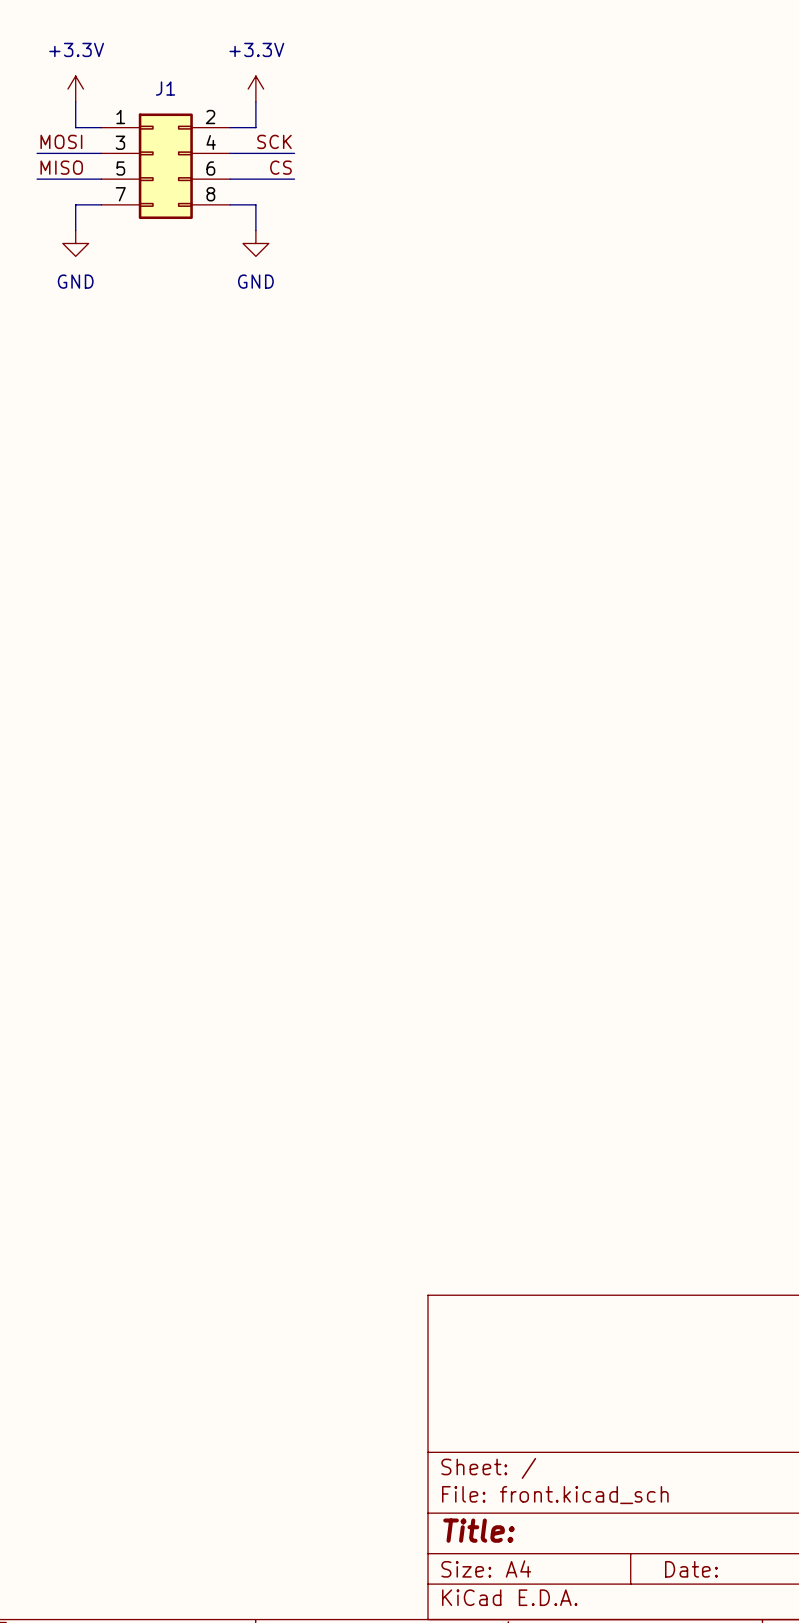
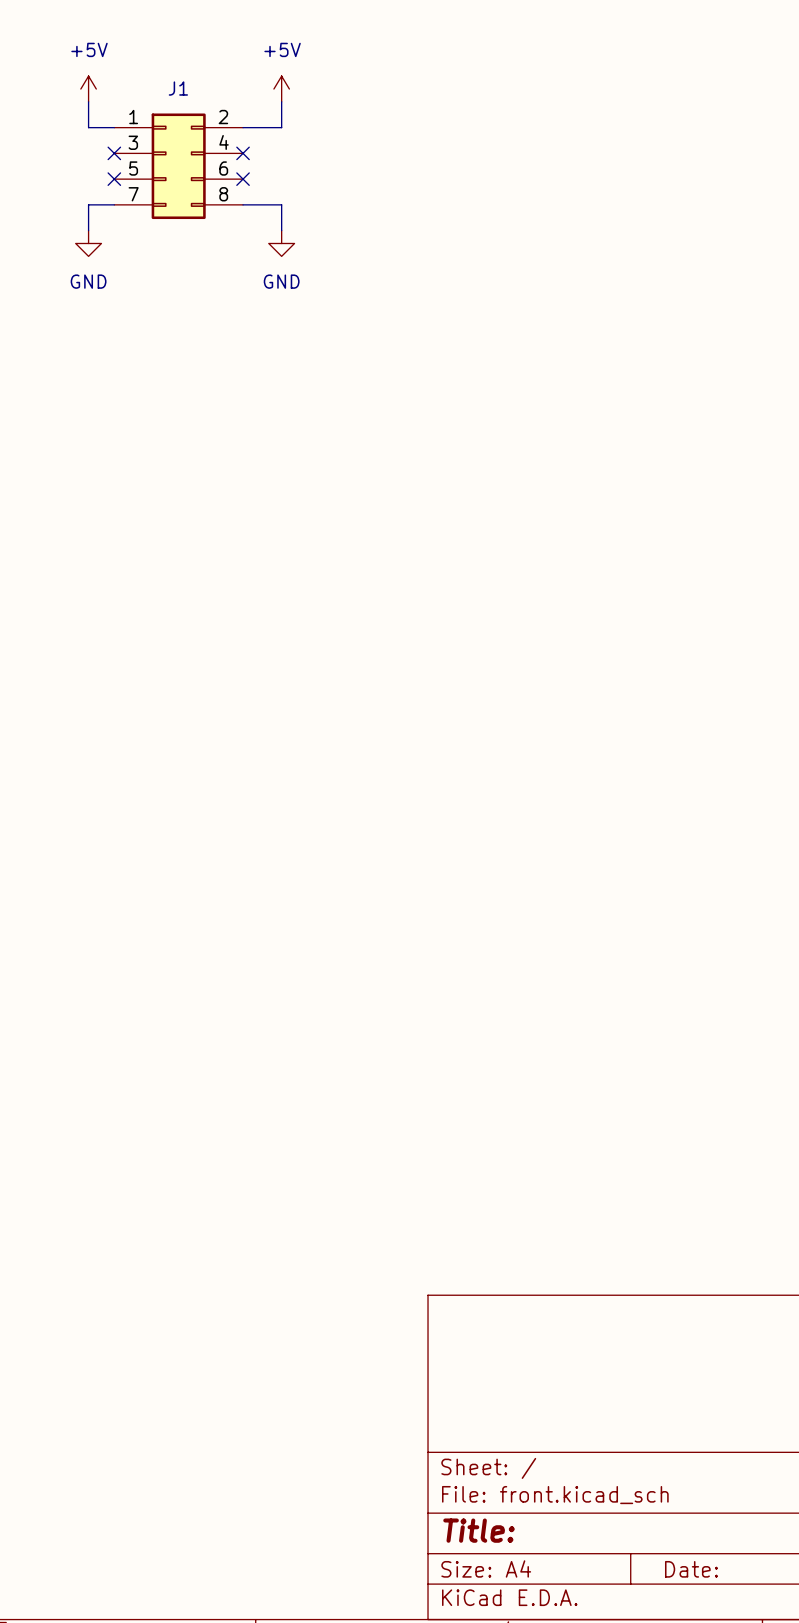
power symbol: +3.3V (75, 89) -> none
power symbol: none -> +5V (88, 89)
power symbol: +3.3V (255, 89) -> none
power symbol: none -> +5V (281, 89)
wire: (75, 101) (75, 127) (88, 127) -> (88, 101) (88, 127)
wire: (255, 101) (255, 127) -> (281, 101) (281, 127) (255, 127)
label: MOSI (61, 141) -> none
label: SCK (274, 141) -> none
wire: (37, 153) (101, 153) -> none
no-connect mark: none -> (114, 153)
wire: (230, 153) (294, 153) -> none
no-connect mark: none -> (243, 153)
J1 position: (165, 166) -> (178, 166)
label: MISO (61, 167) -> none
label: CS (280, 167) -> none
wire: (37, 179) (101, 179) -> none
no-connect mark: none -> (114, 179)
wire: (230, 179) (294, 179) -> none
no-connect mark: none -> (243, 179)
wire: (88, 204) (75, 204) (75, 230) -> (88, 204) (88, 230)
wire: (255, 204) (255, 230) -> (255, 204) (281, 204) (281, 230)
power symbol position: GND (75, 243) -> GND (88, 243)
power symbol position: GND (255, 243) -> GND (281, 243)

